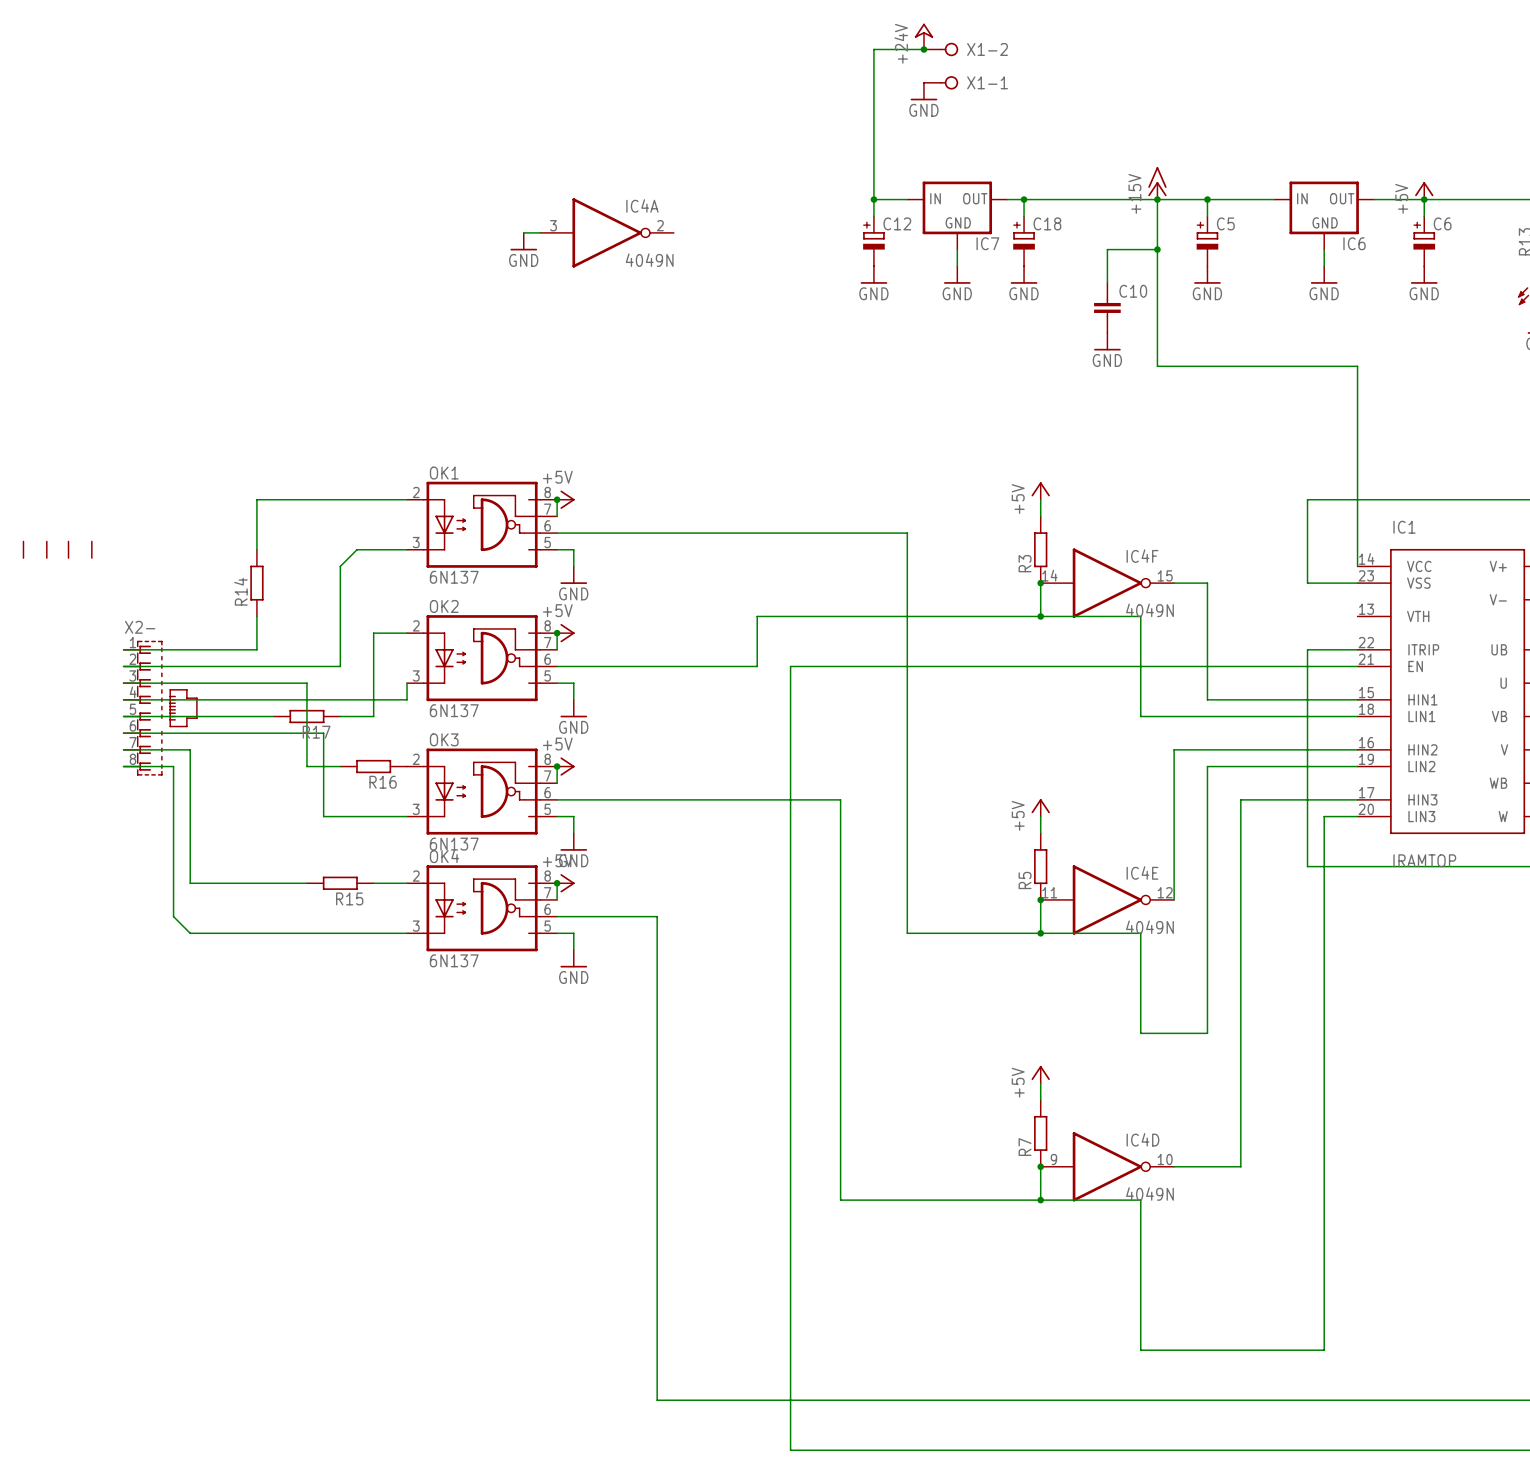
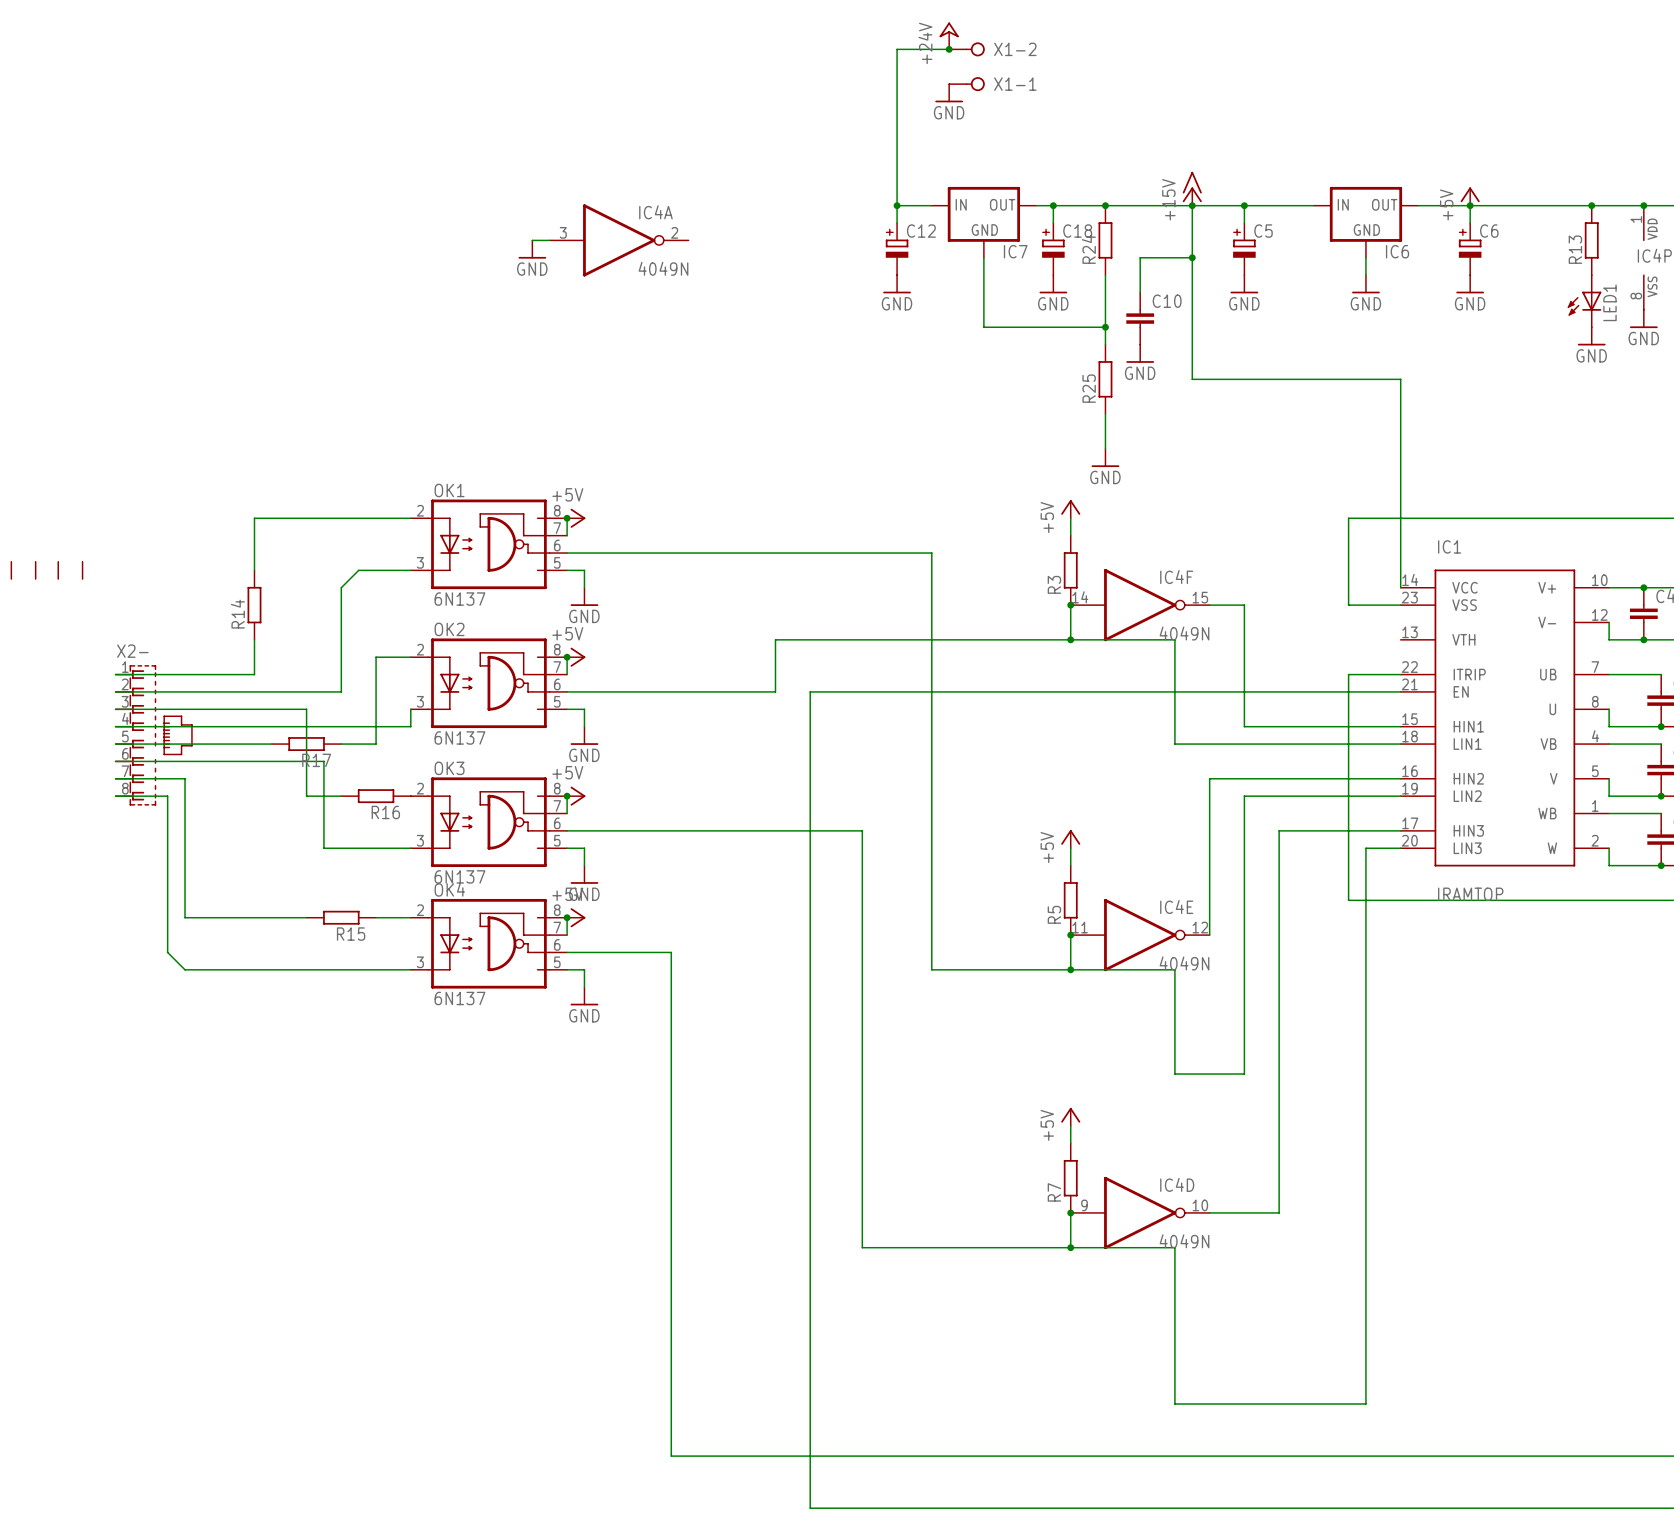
junction: none -> (1105, 205)
R24: none -> (1105, 240)
wire: none -> (983, 275) (983, 327) (1105, 327)
wire: none -> (1105, 275) (1105, 344)
power symbol: GND (957, 275) -> none
junction: none -> (1105, 327)
R25: none -> (1105, 379)
wire: none -> (1105, 414) (1105, 448)
power symbol: none -> GND (1105, 457)

